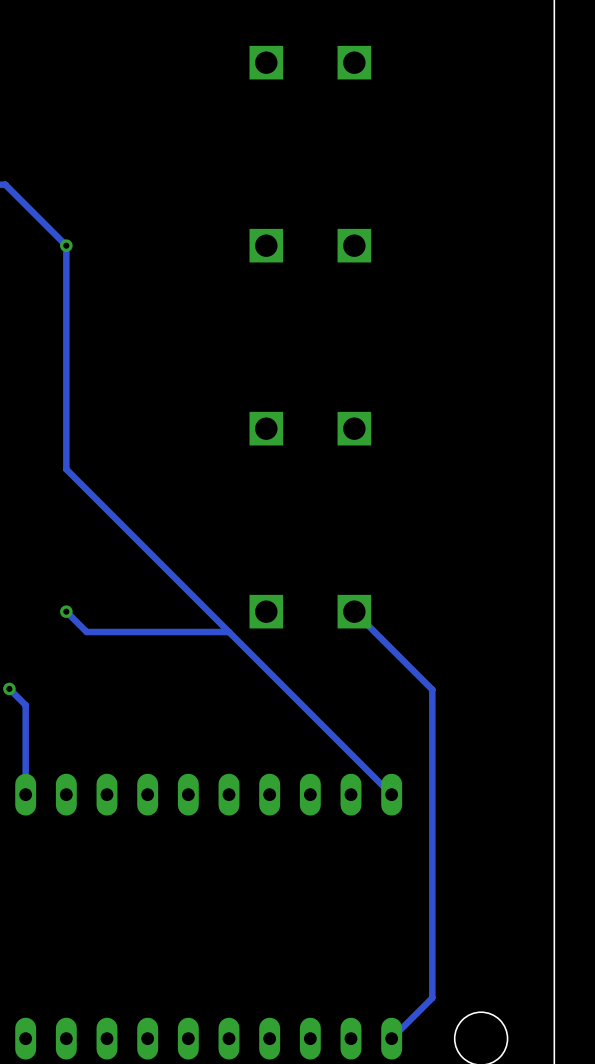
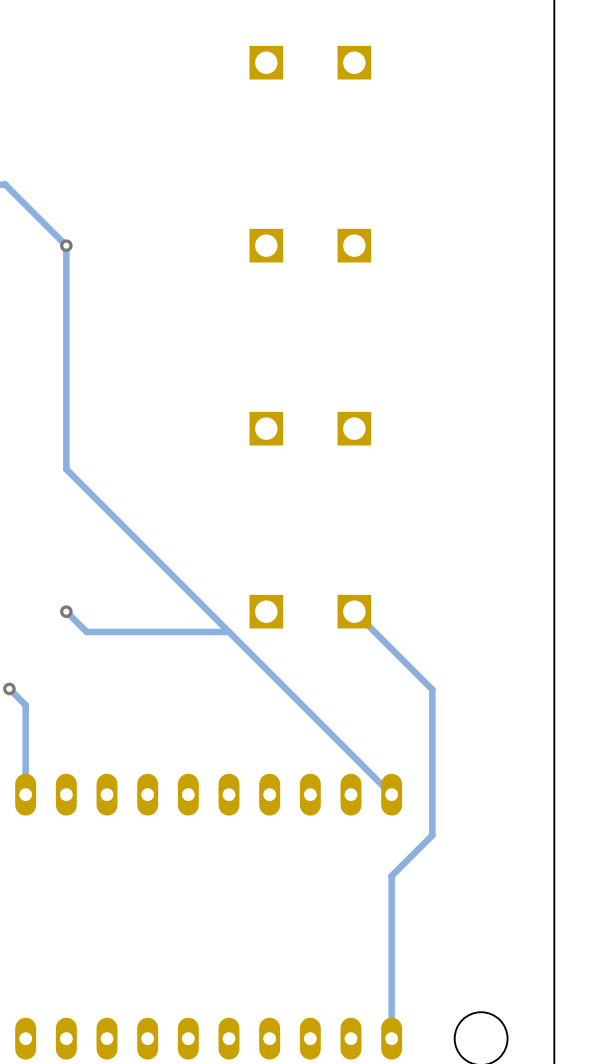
track: (432, 835) (432, 997) (391, 1038) -> (432, 835) (391, 875) (391, 1038)

